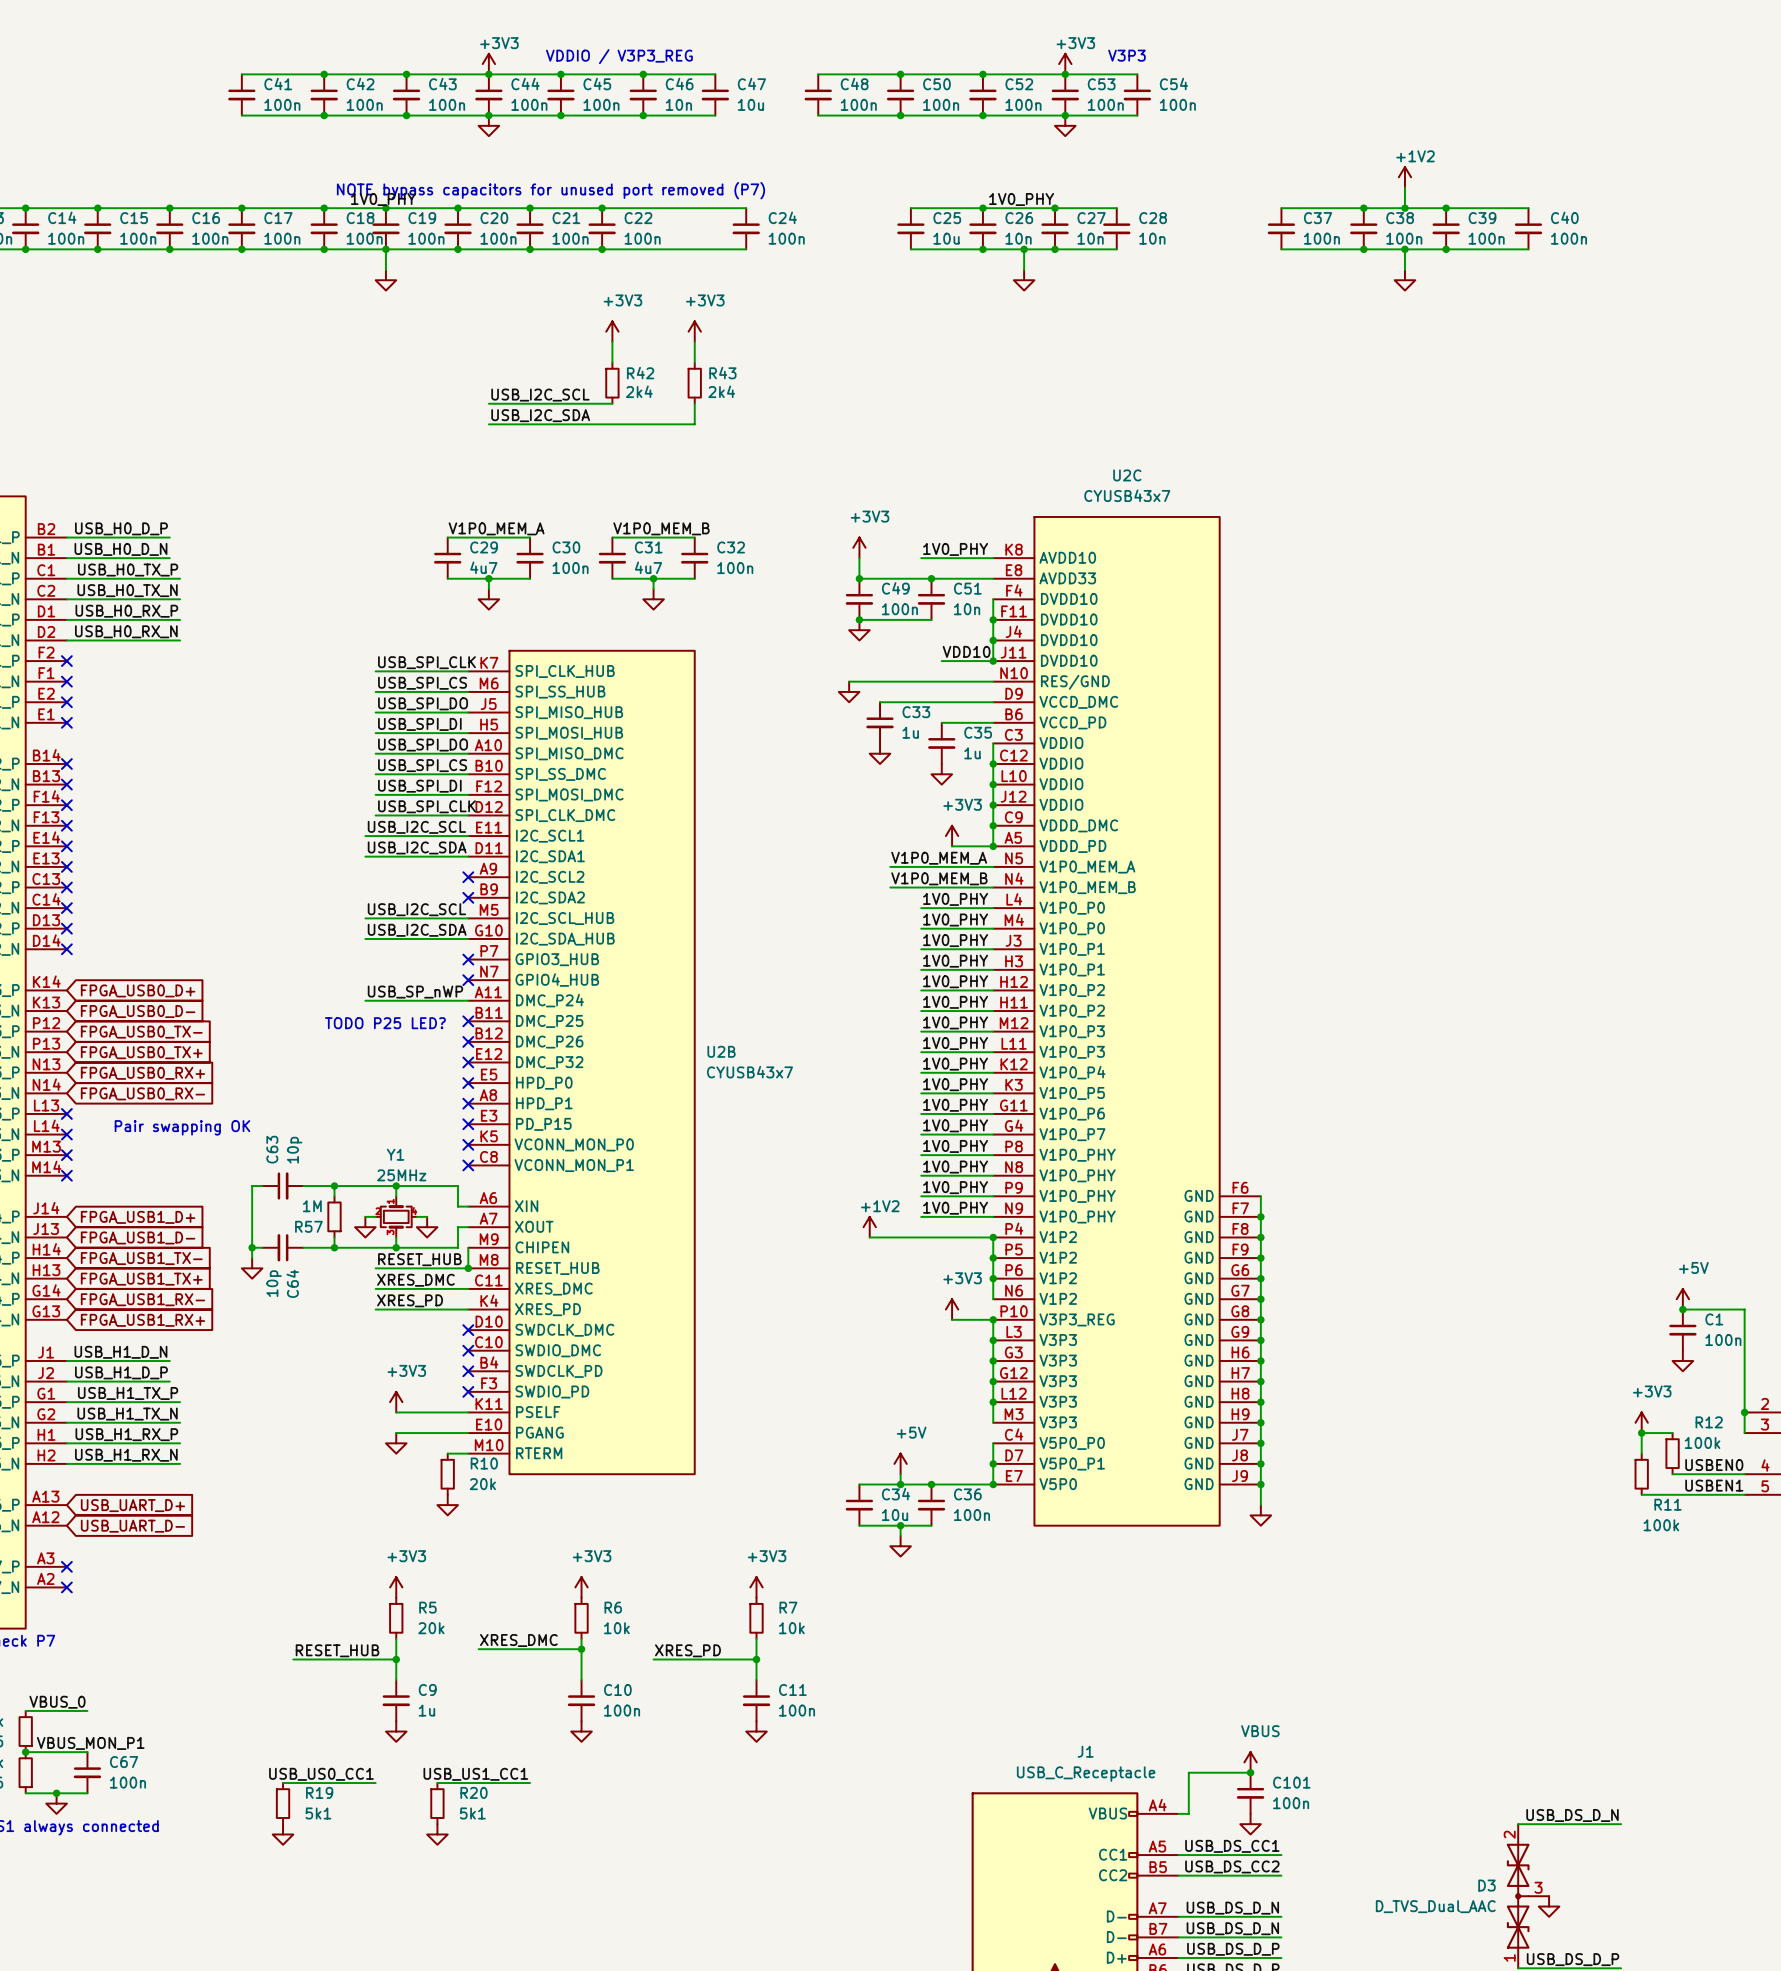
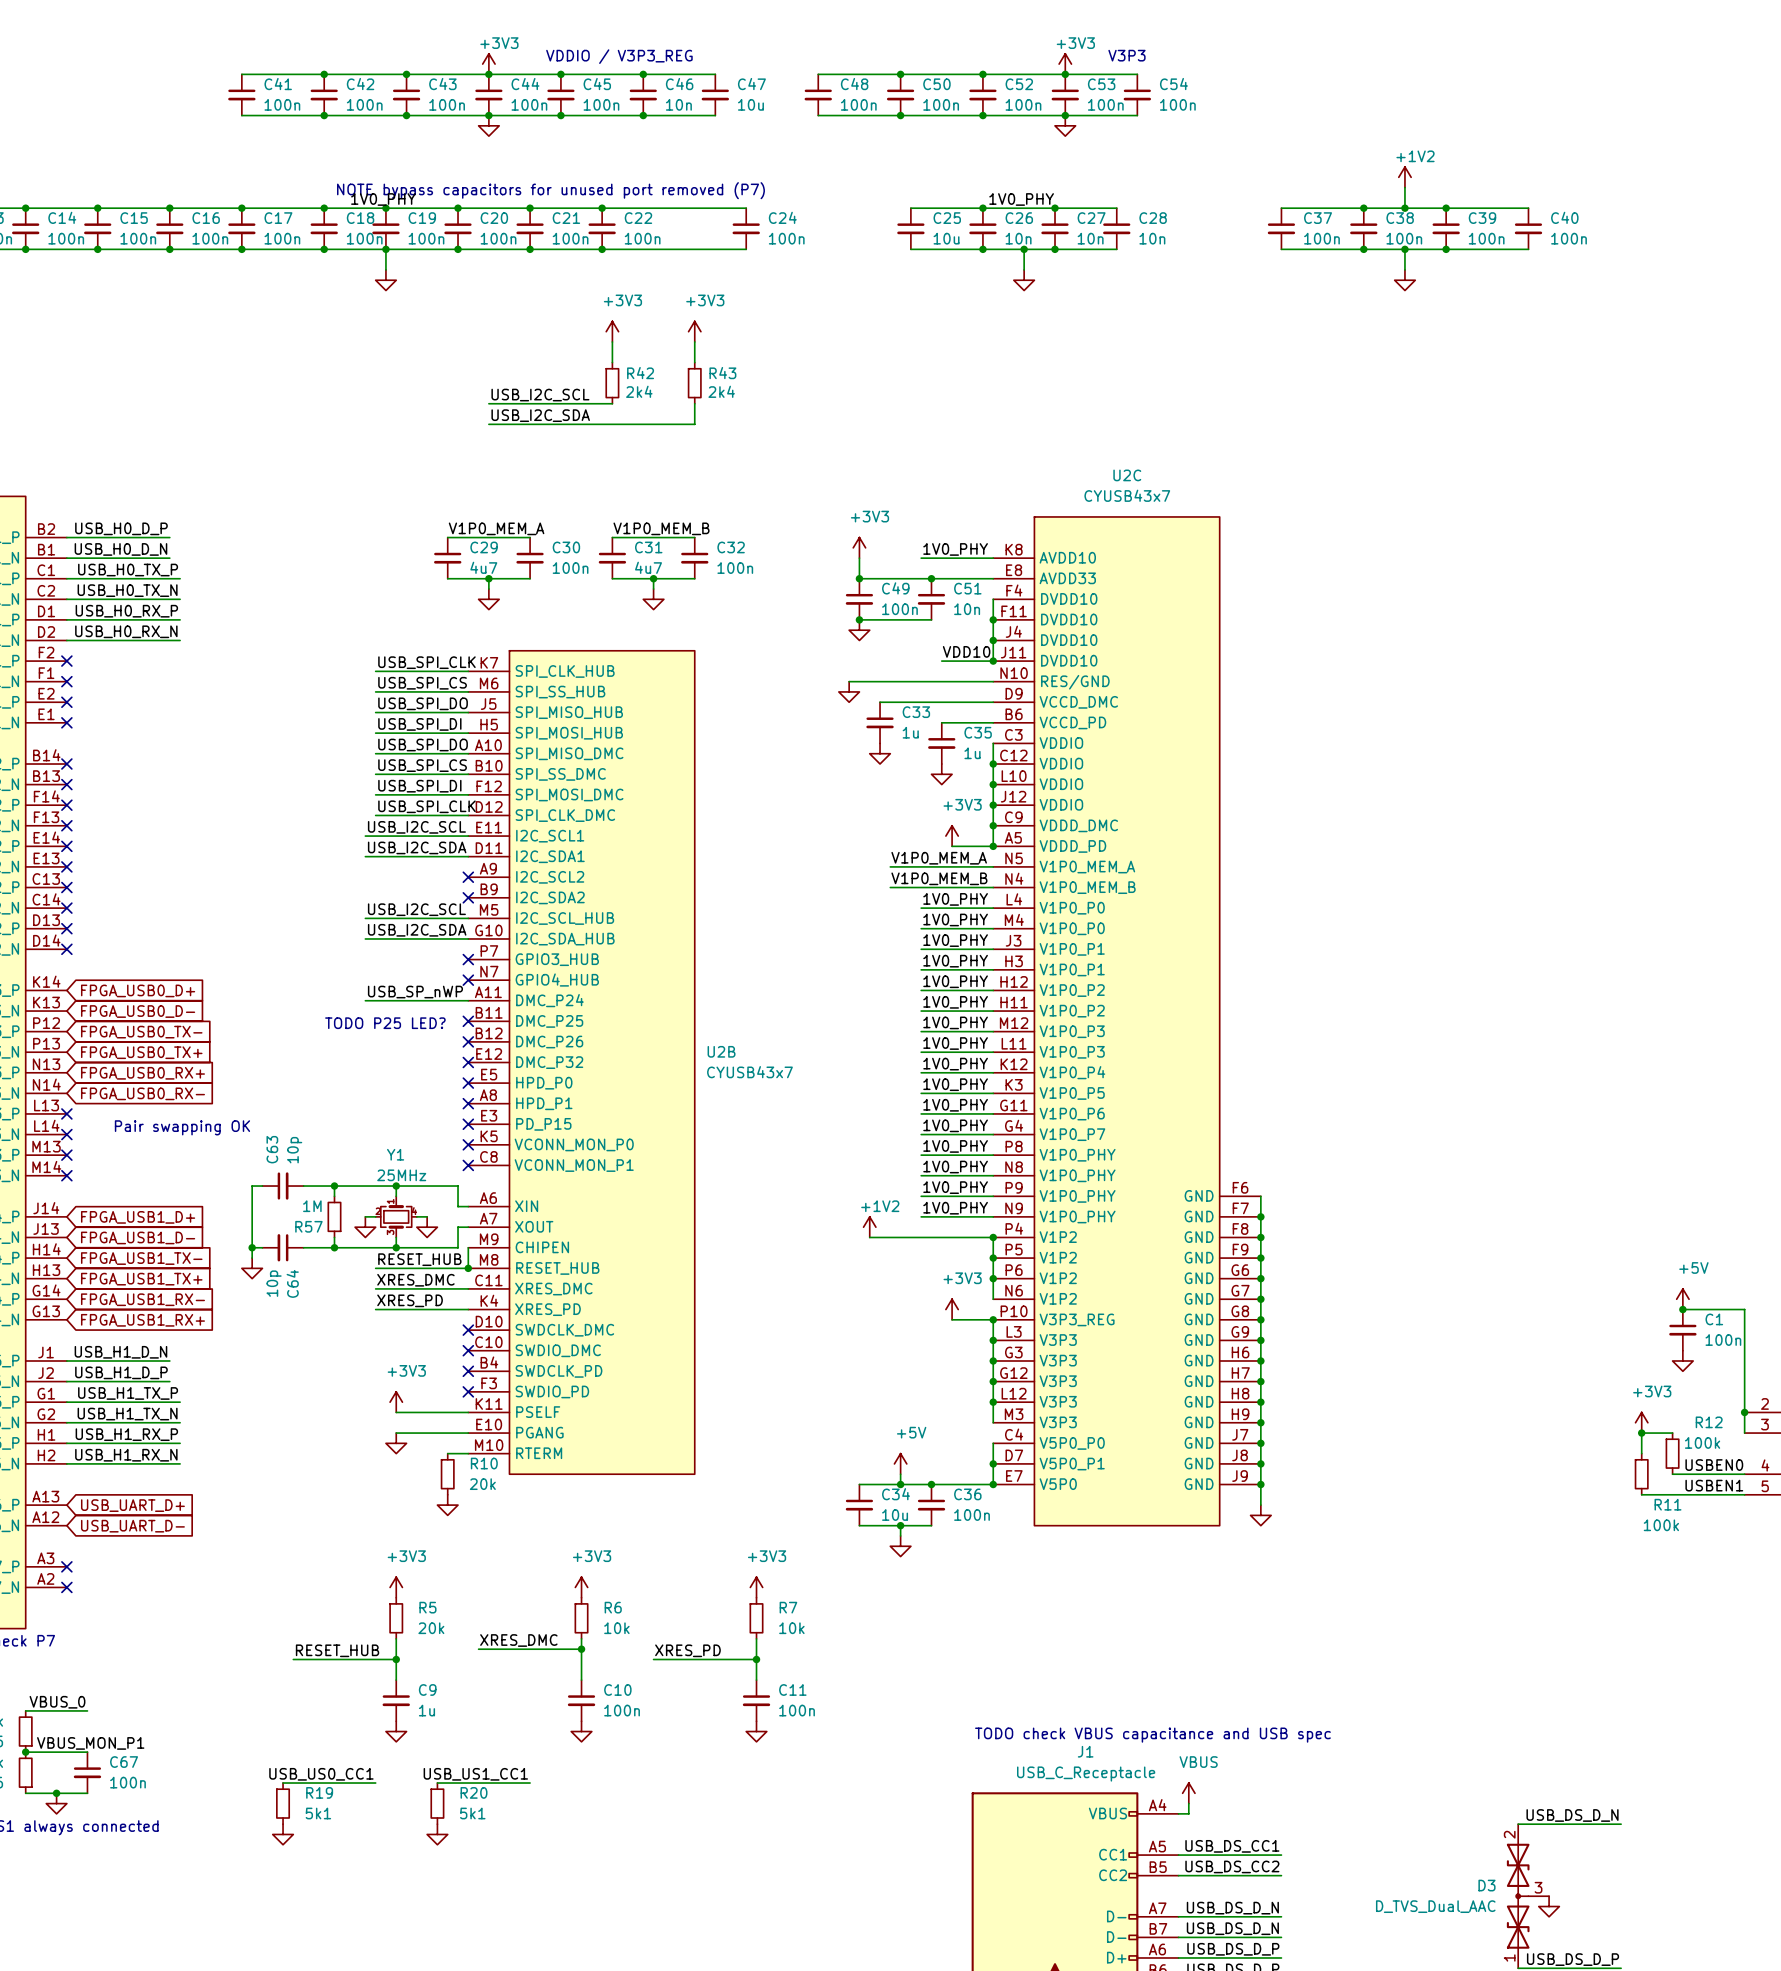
text: none -> TODO check VBUS capacitance and USB spec (1152, 1735)
power symbol position: VBUS (1250, 1762) -> VBUS (1188, 1793)
wire: (1250, 1772) (1188, 1772) (1188, 1803) -> none
junction: (1250, 1772) -> none
C101: 100n (1250, 1793) -> none
power symbol: (1250, 1824) -> none

